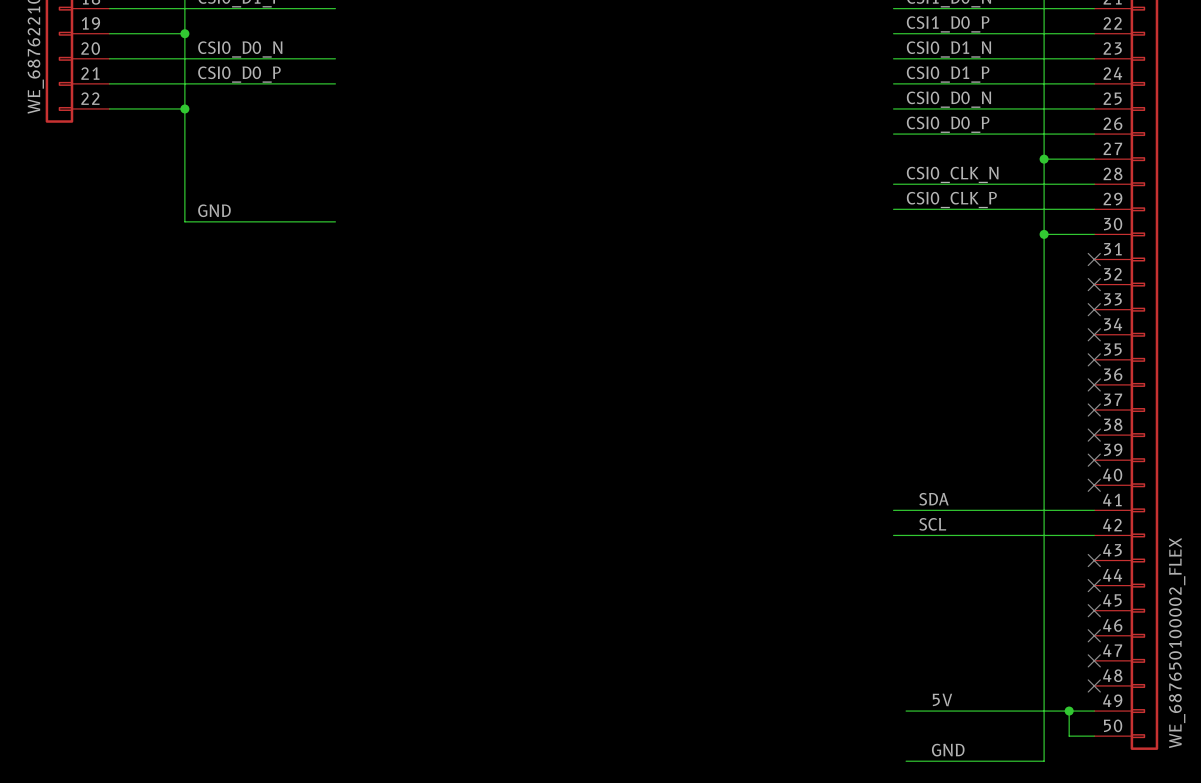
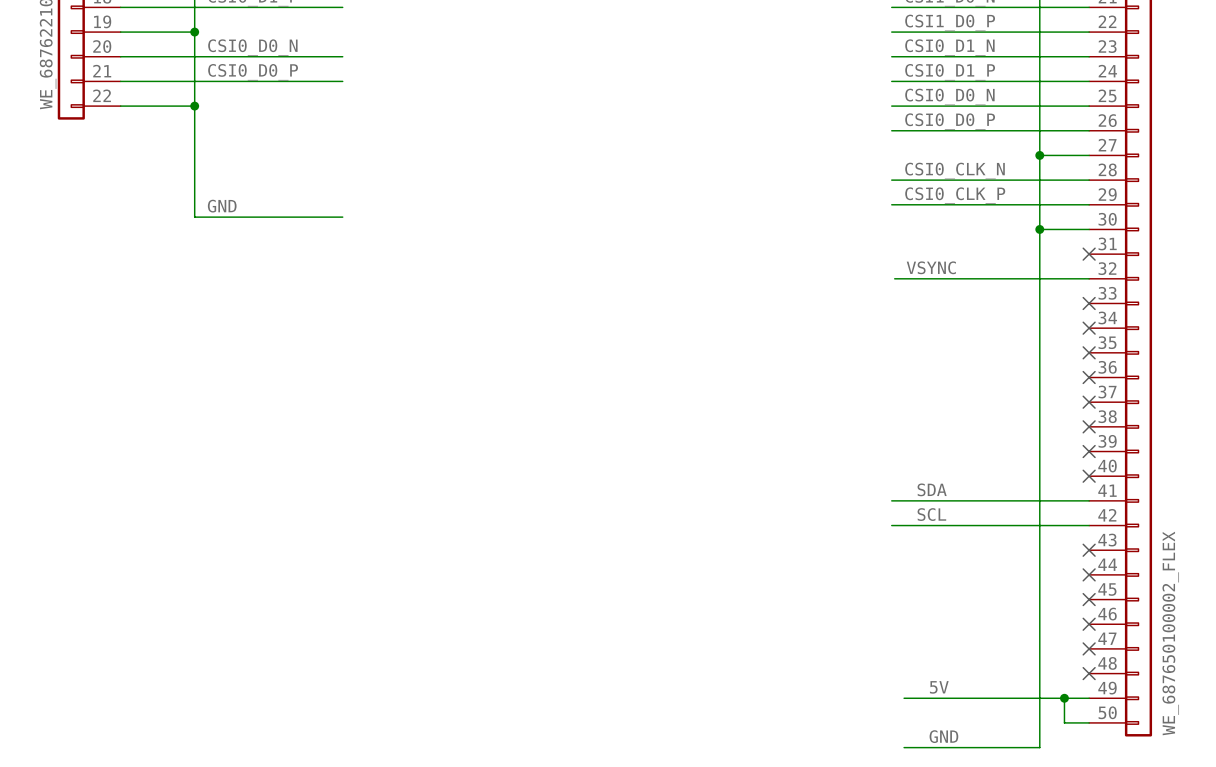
label: none -> VSYNC (931, 267)
wire: none -> (894, 278) (1089, 278)
no-connect mark: (1094, 284) -> none

